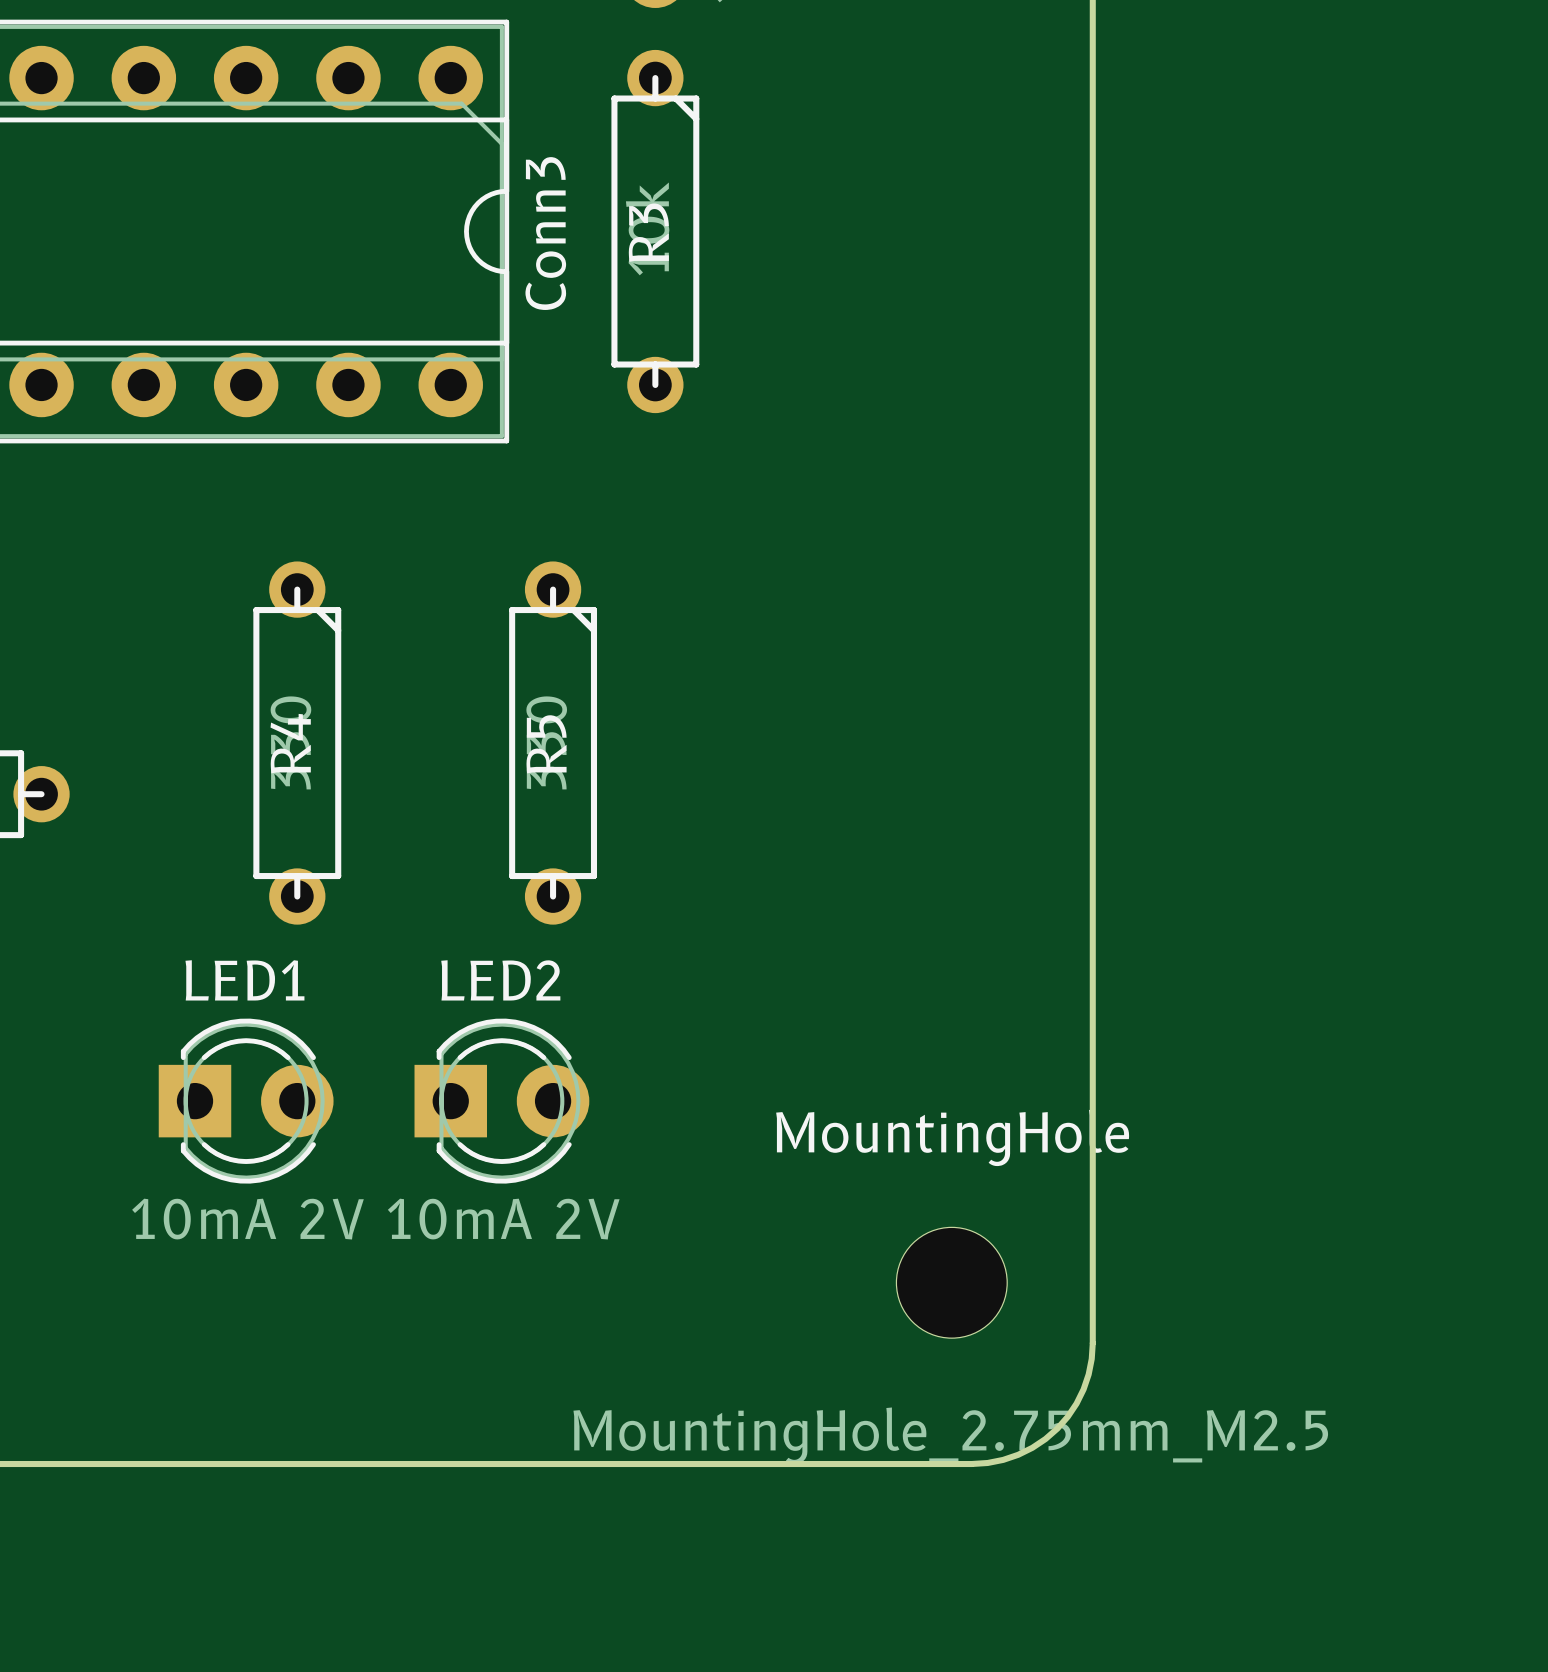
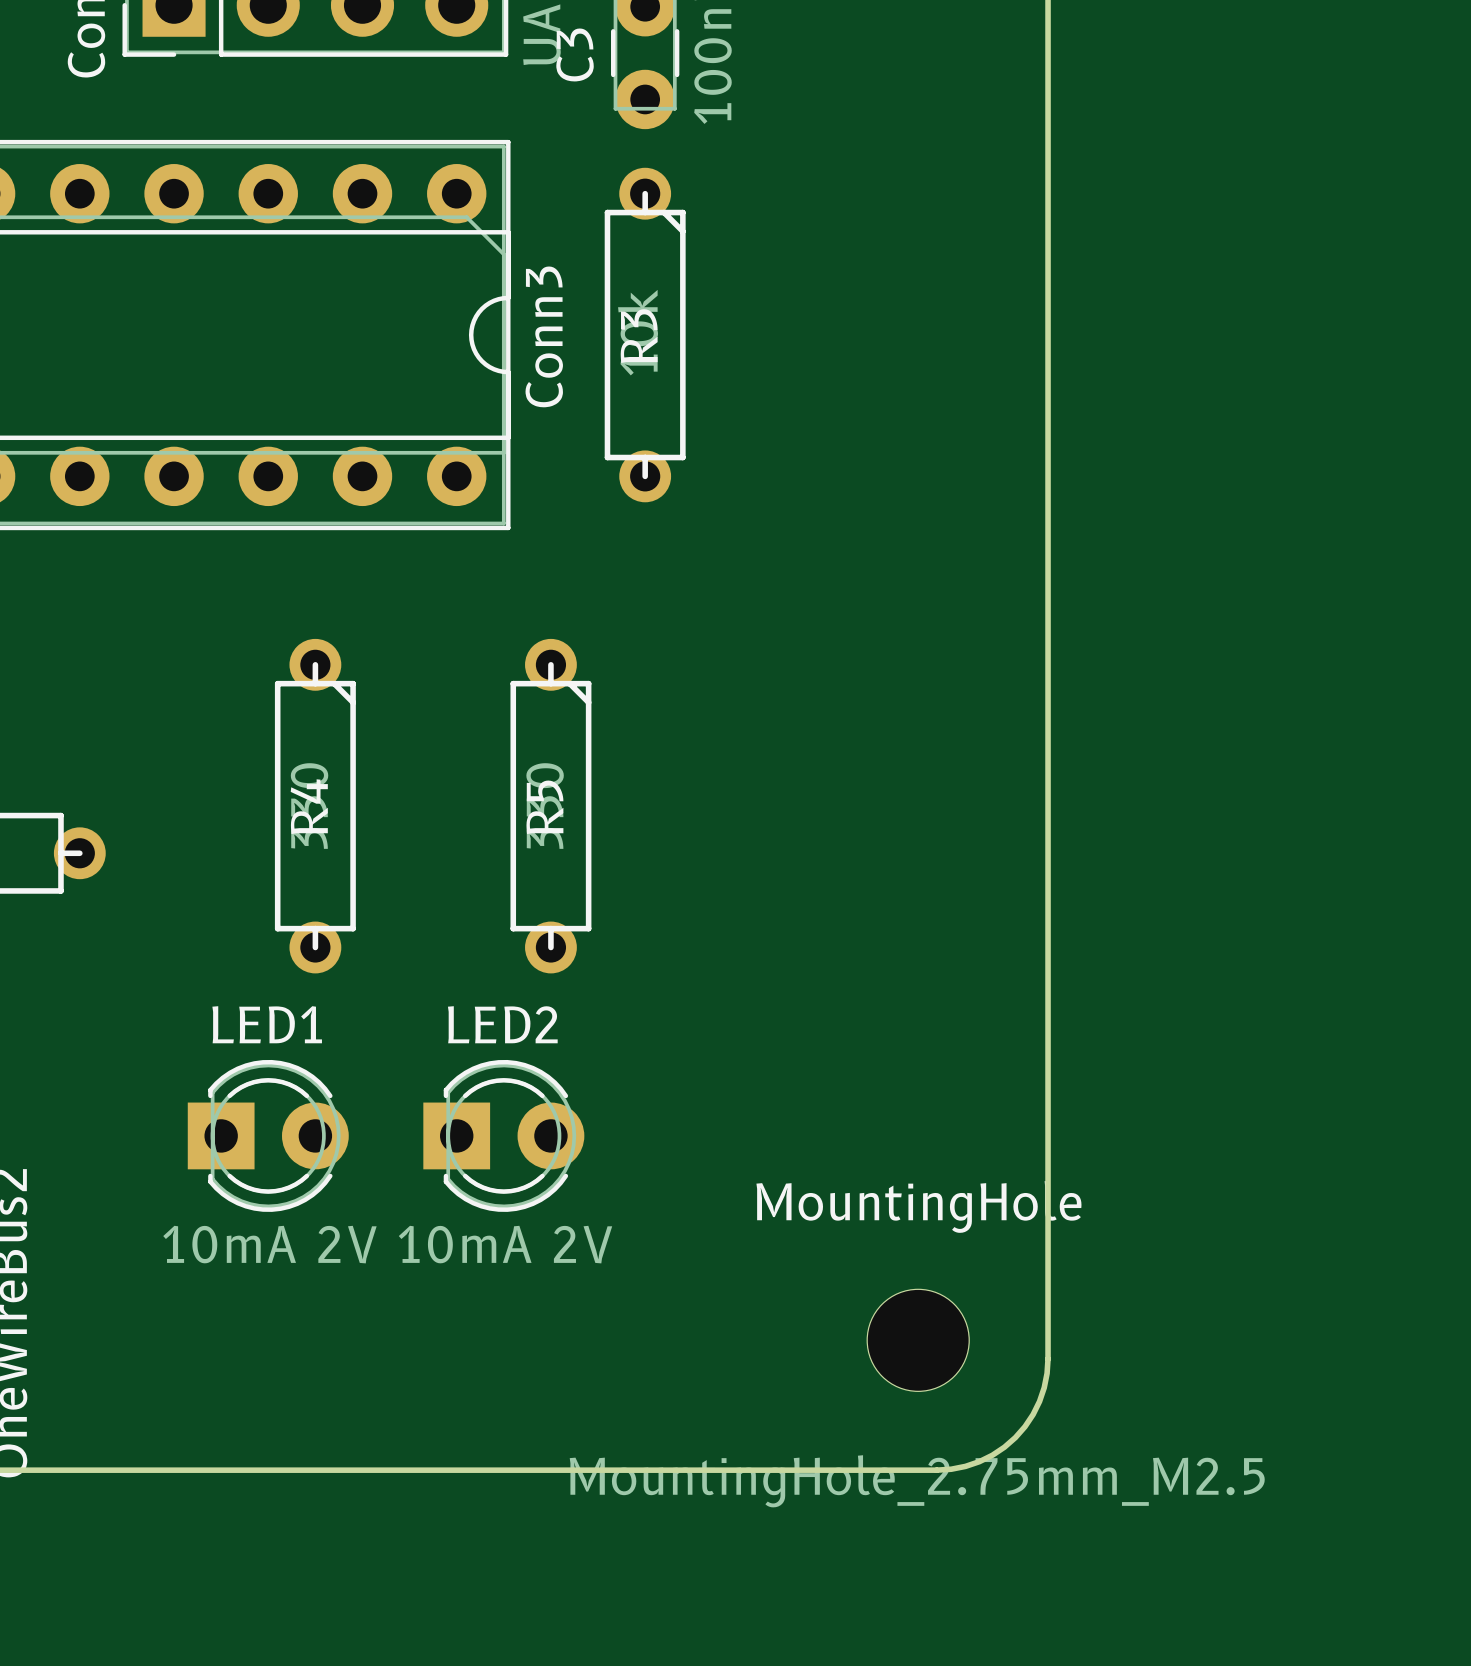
MountingHole position: (951, 1282) -> (918, 1340)

